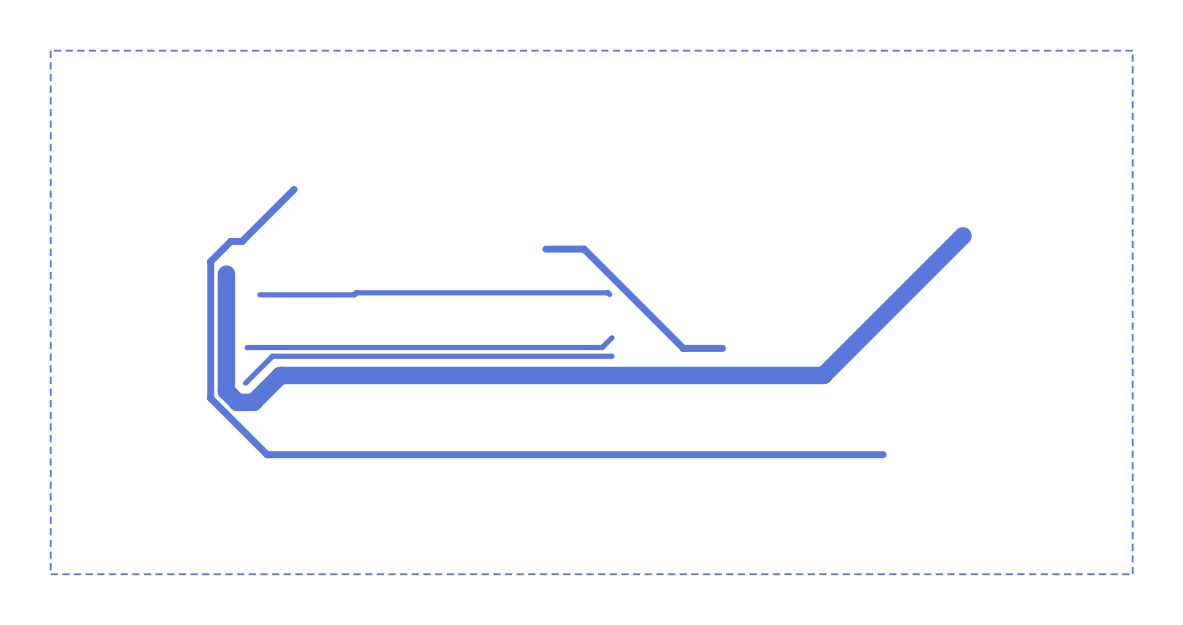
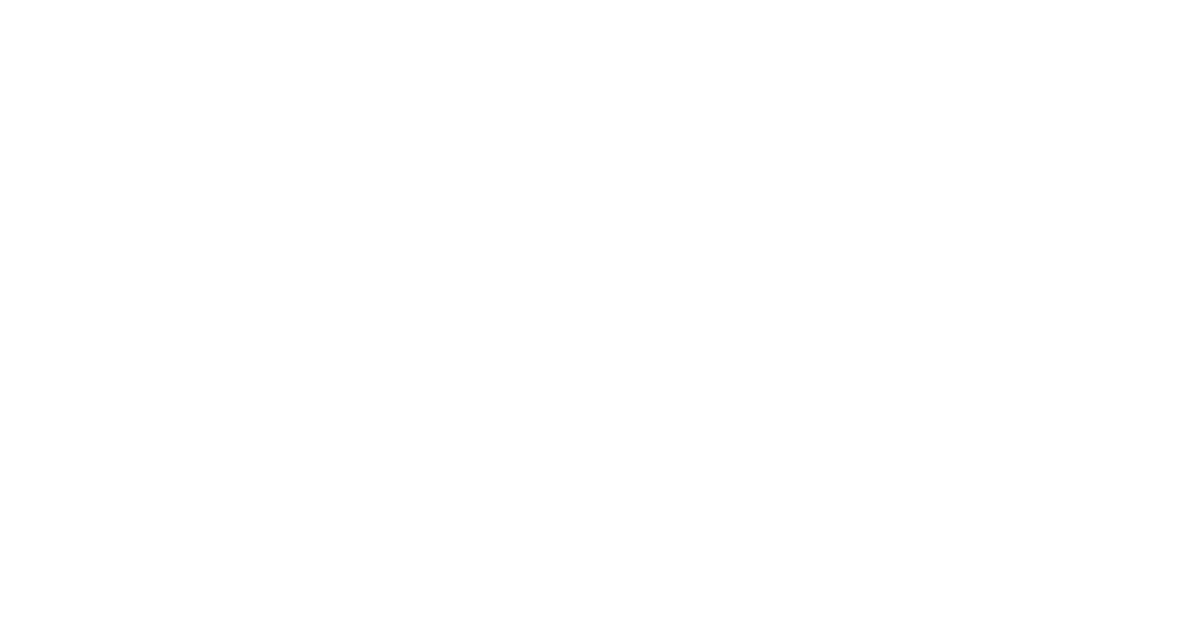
bottom zone outline: (1132, 50) (50, 50) (50, 574) (1132, 574) (1132, 50) -> none
bottom track: (294, 189) (242, 241) (230, 241) (210, 261) (210, 398) (267, 454) (883, 454) -> none
bottom track: (963, 235) (823, 375) (280, 375) (253, 402) (237, 402) (226, 391) (226, 274) -> none
bottom track: (545, 249) (584, 249) (683, 348) (722, 348) -> none
bottom track: (609, 294) (608, 292) (356, 292) (354, 294) (259, 294) -> none
bottom track: (611, 337) (602, 347) (247, 347) -> none
bottom track: (611, 356) (272, 356) (245, 383) -> none

